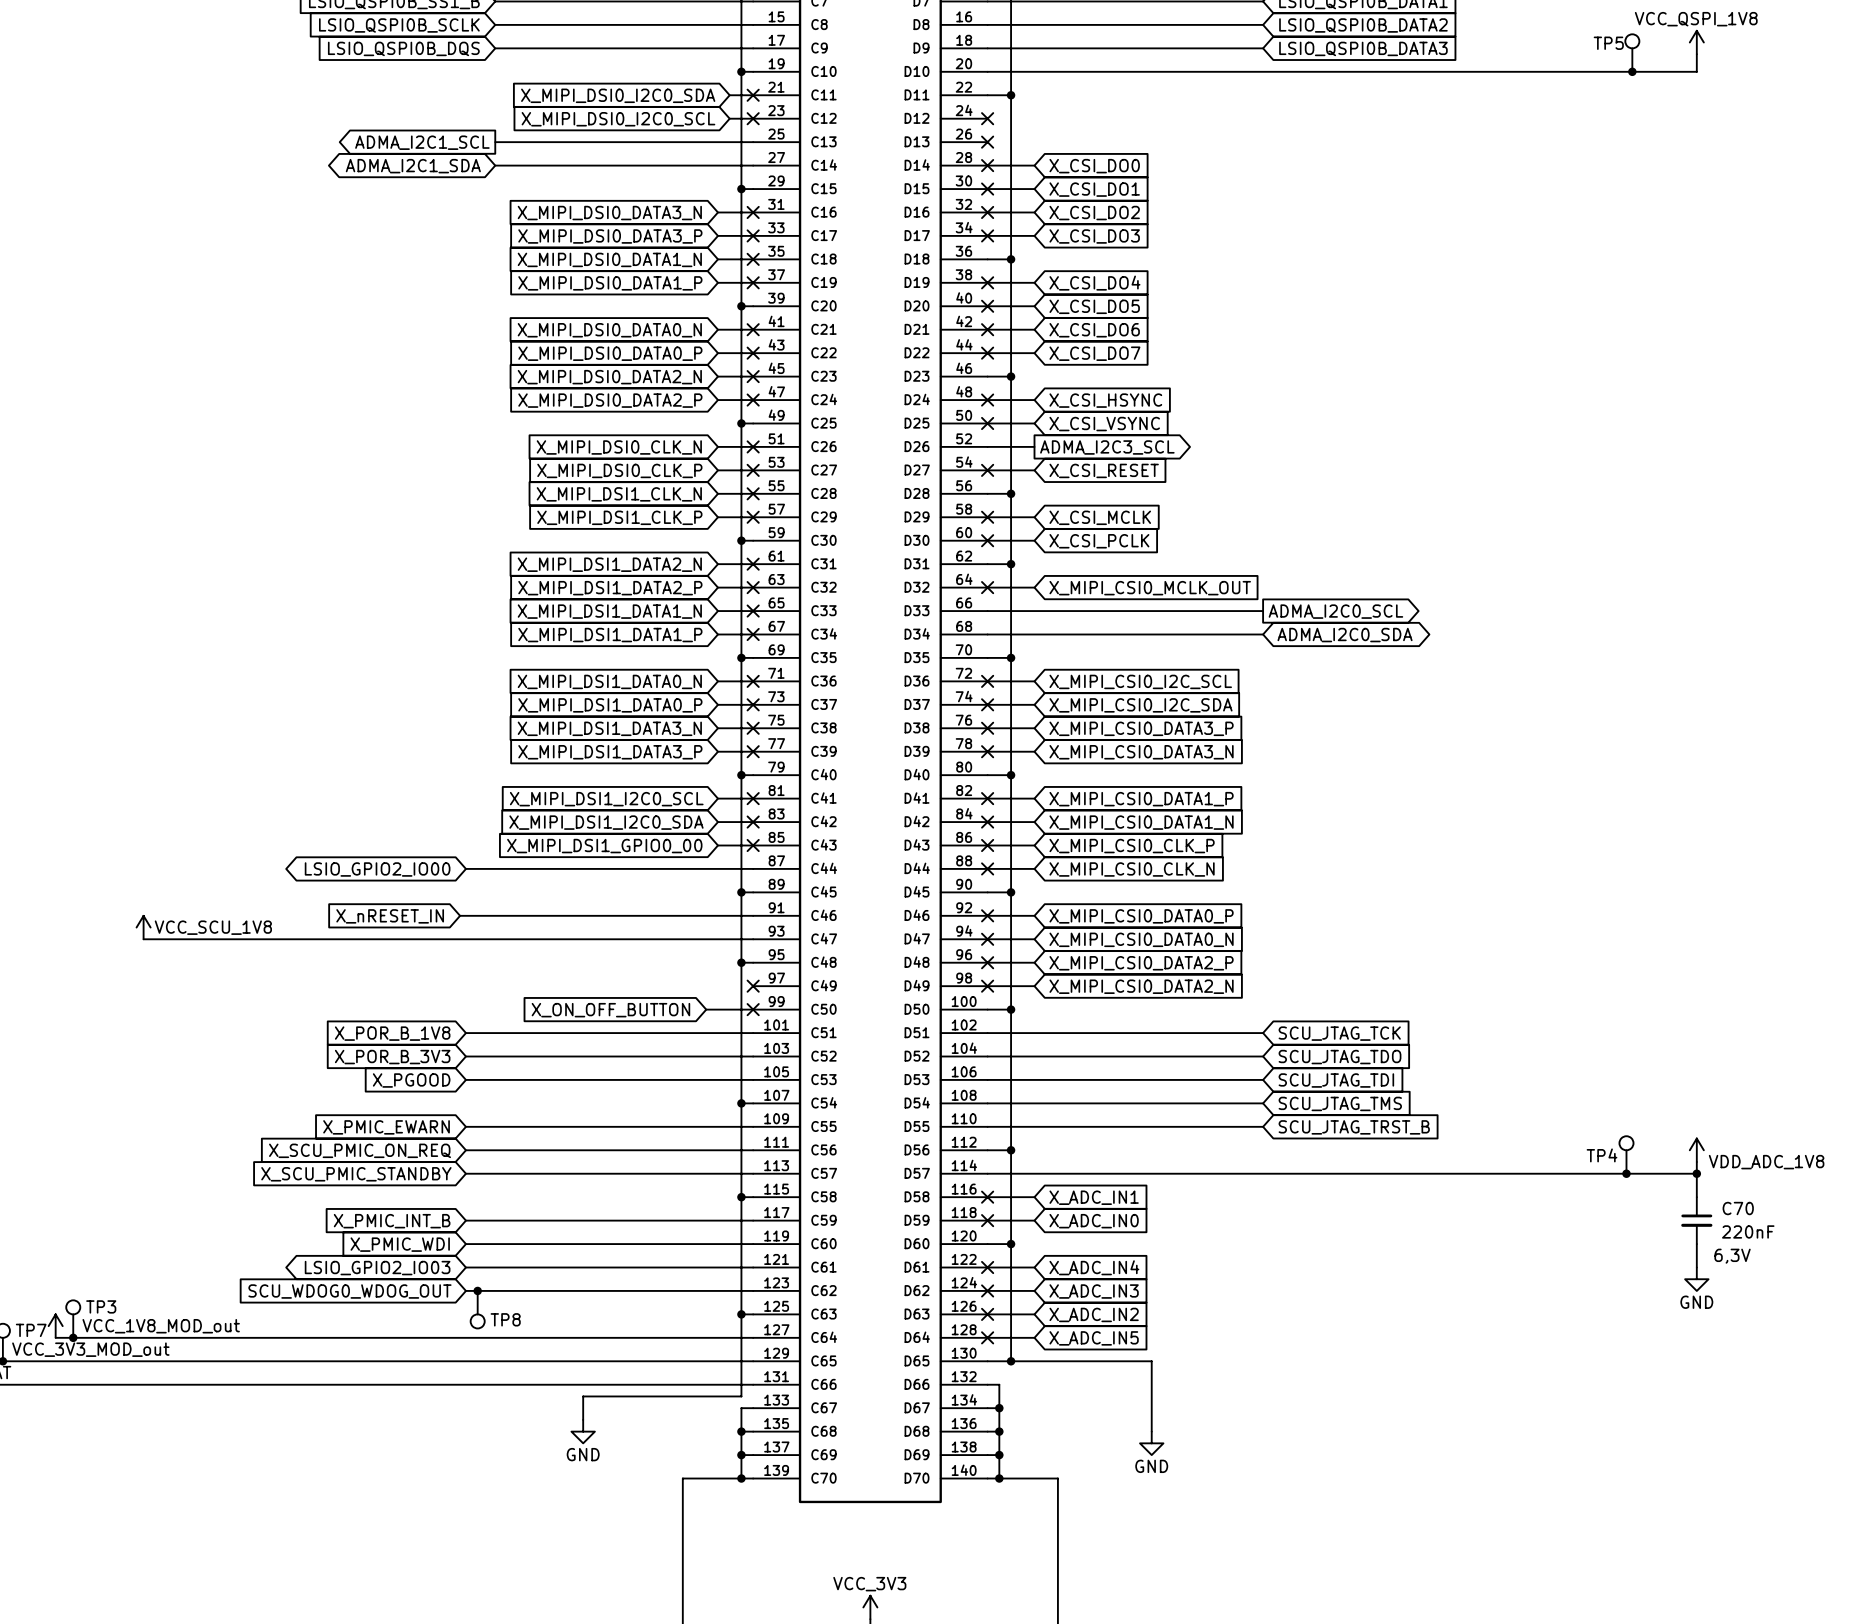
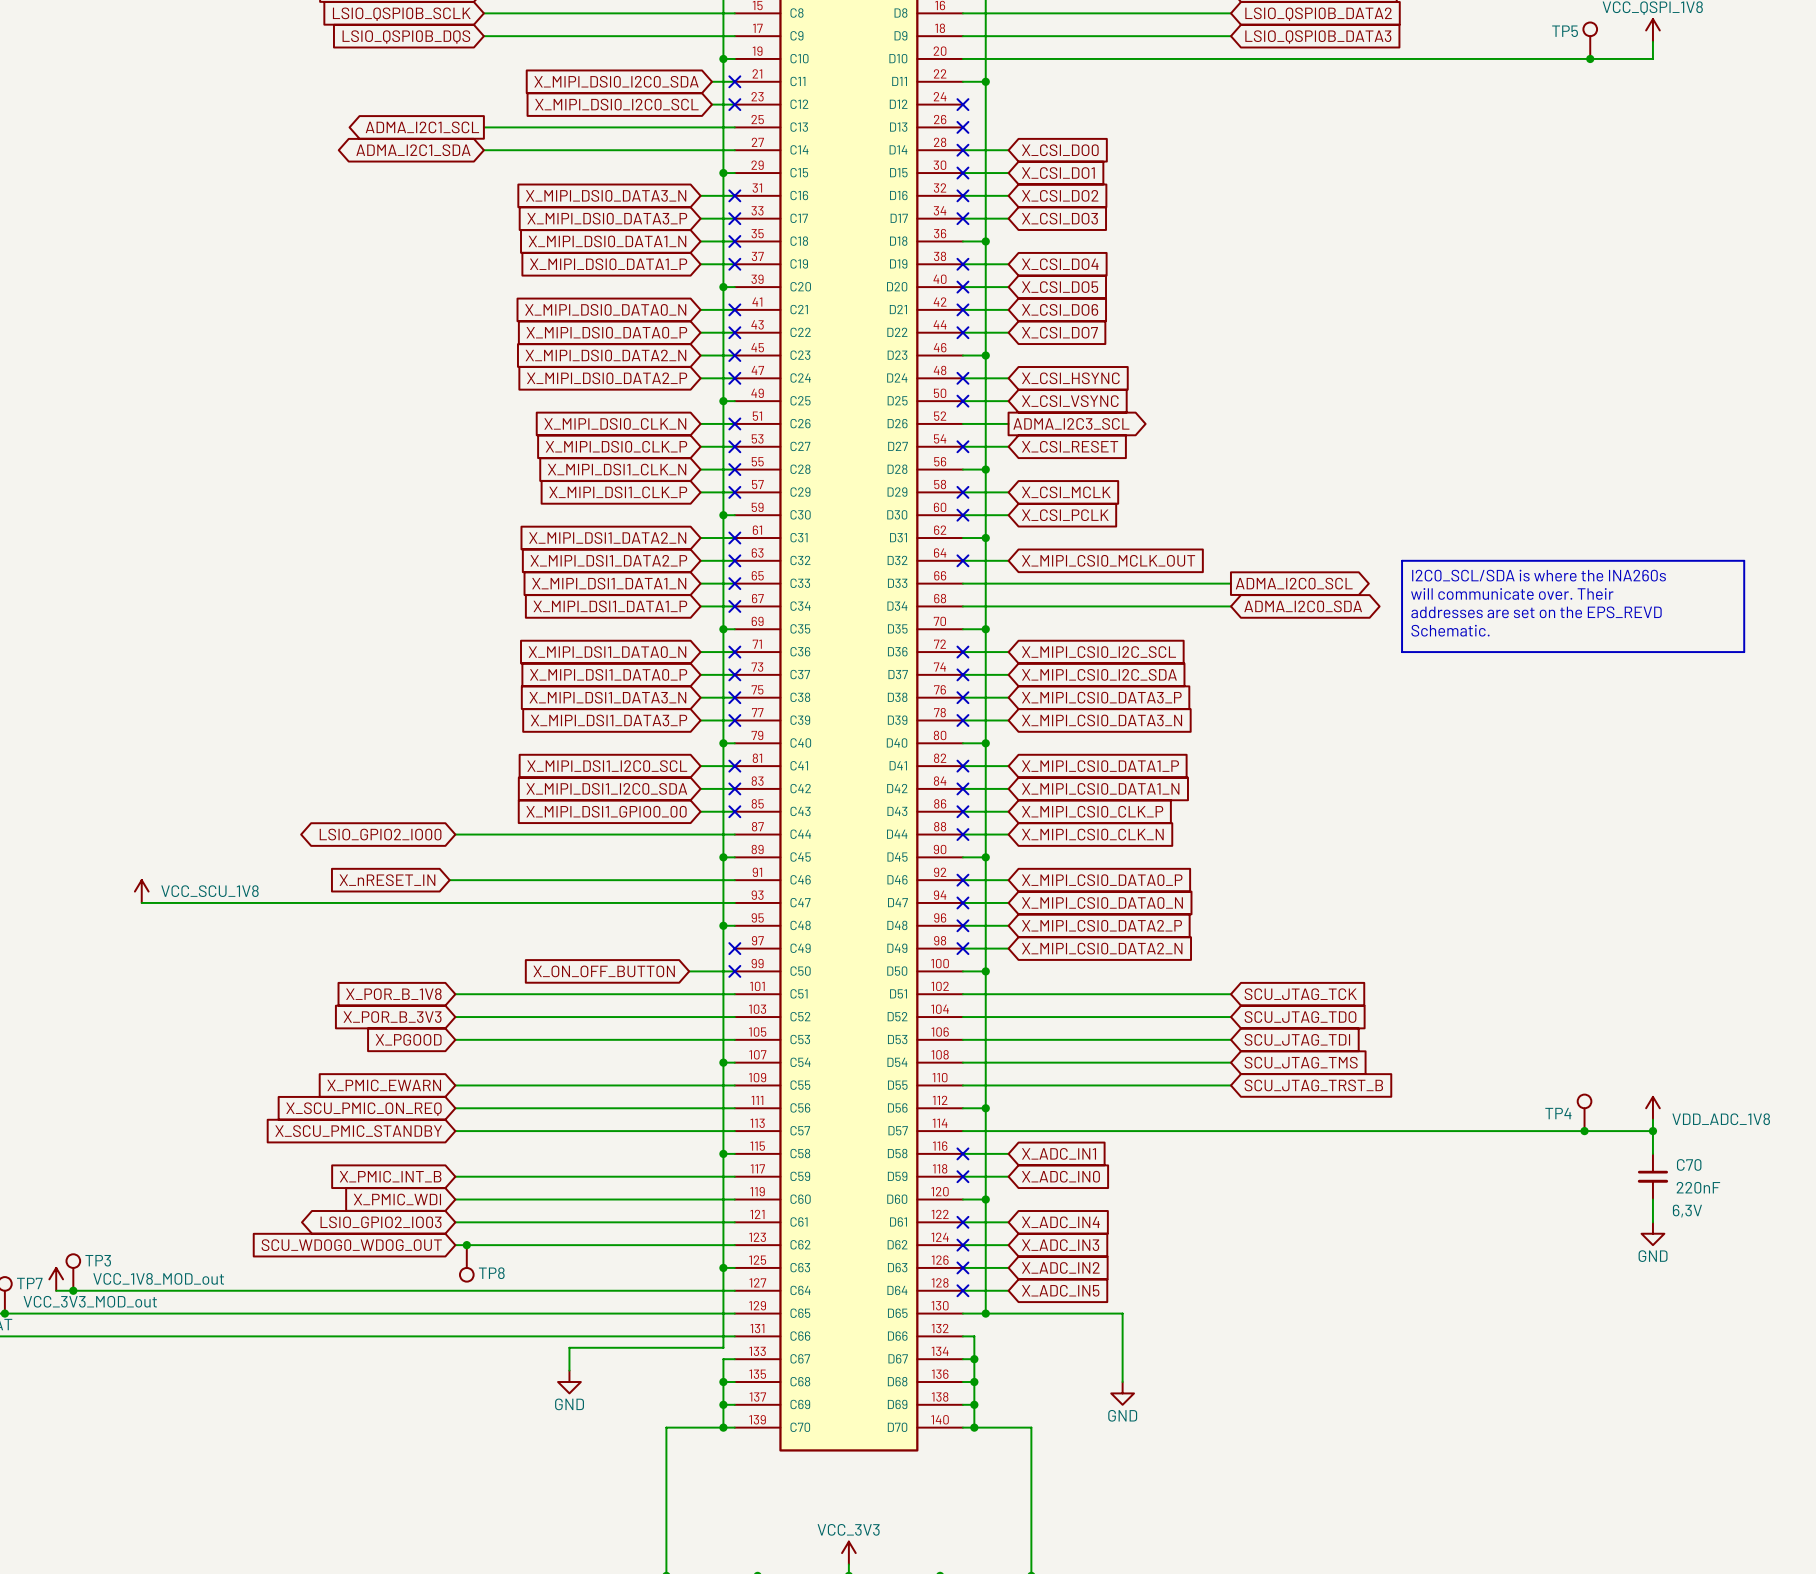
line: none -> (1402, 560) (1744, 560) (1744, 652) (1402, 652) (1402, 560)
text: none -> I2C0_SCL/SDA is where the INA260s (1539, 575)
text: none -> will communicate over. Their (1512, 593)
text: none -> addresses are set on the EPS_REVD (1536, 612)
text: none -> Schematic. (1450, 630)

